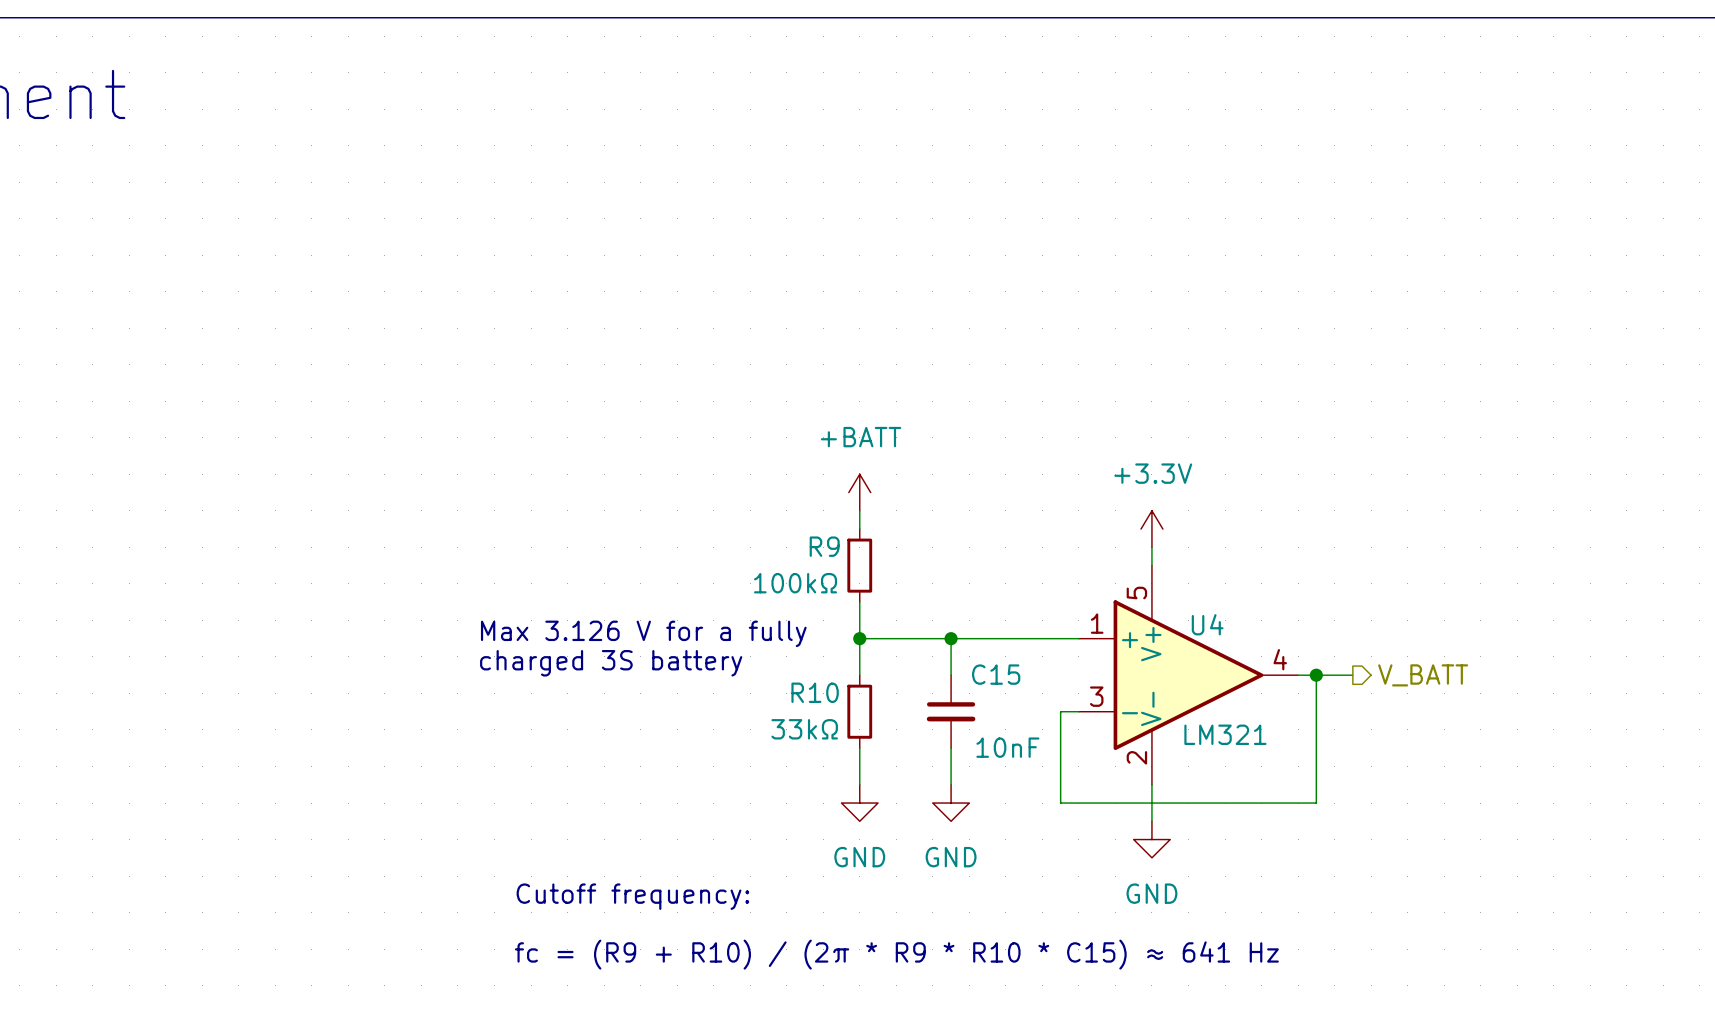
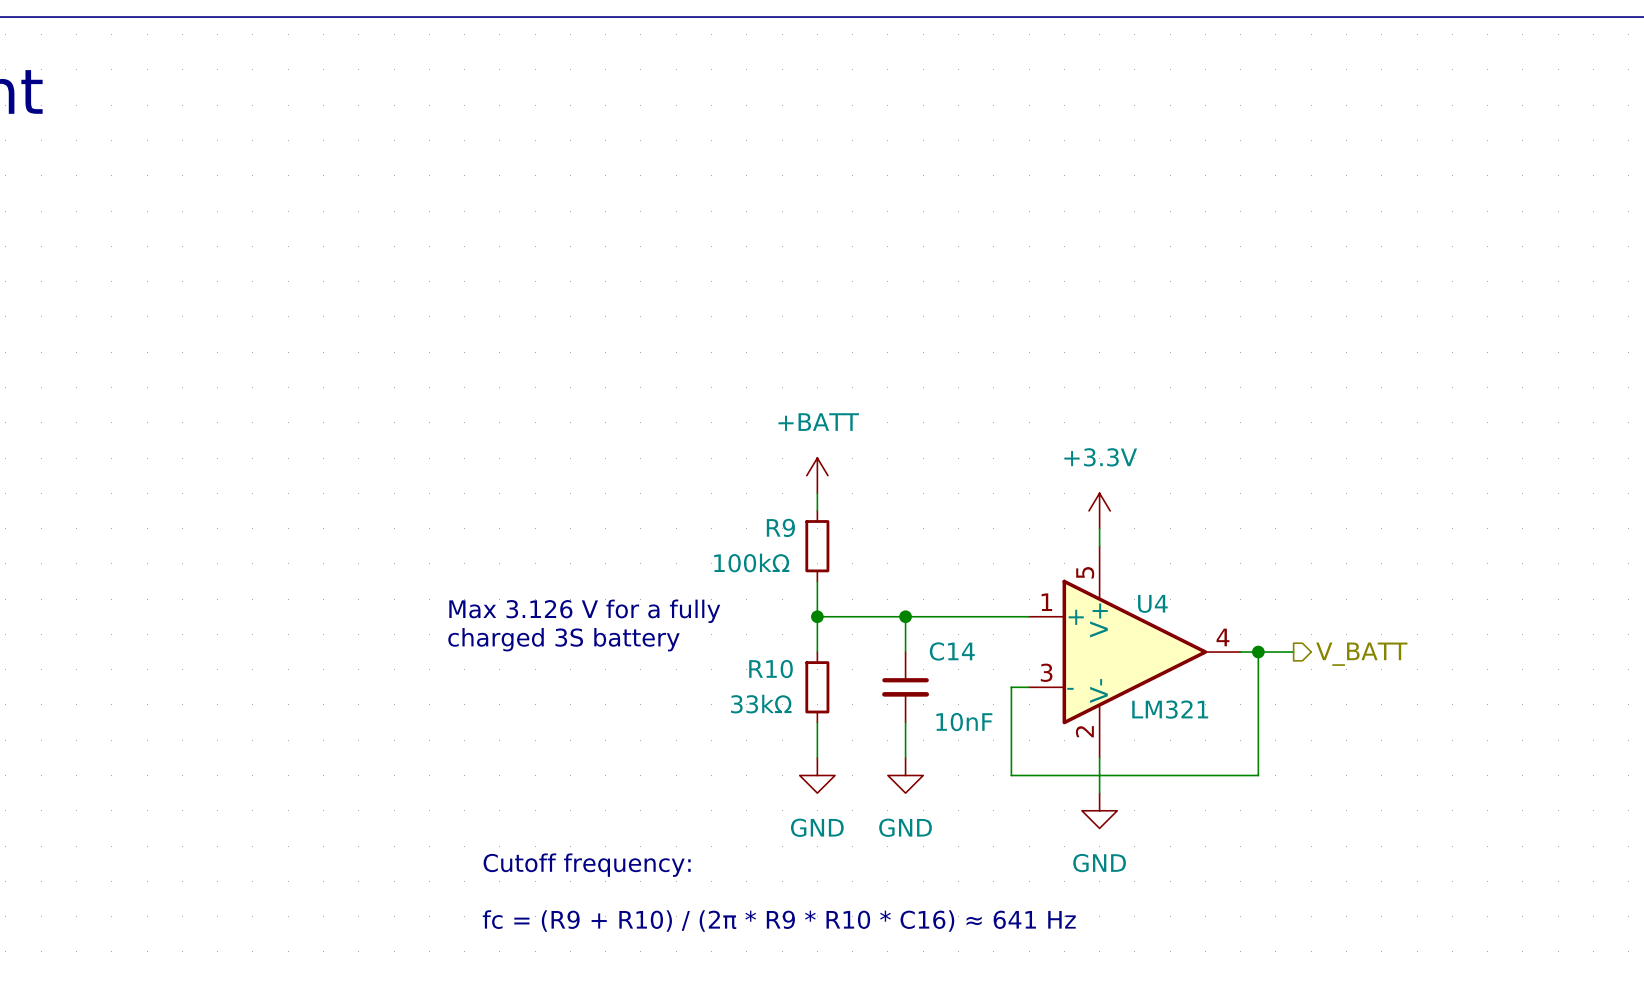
C15 name: C15 (996, 674) -> C14 (952, 651)
text: fc = (R9 + R10) / (2π * R9 * R10 * C15) ≈ 641 Hz (896, 954) -> fc = (R9 + R10) / (2π * R9 * R10 * C16) ≈ 641 Hz (779, 921)

